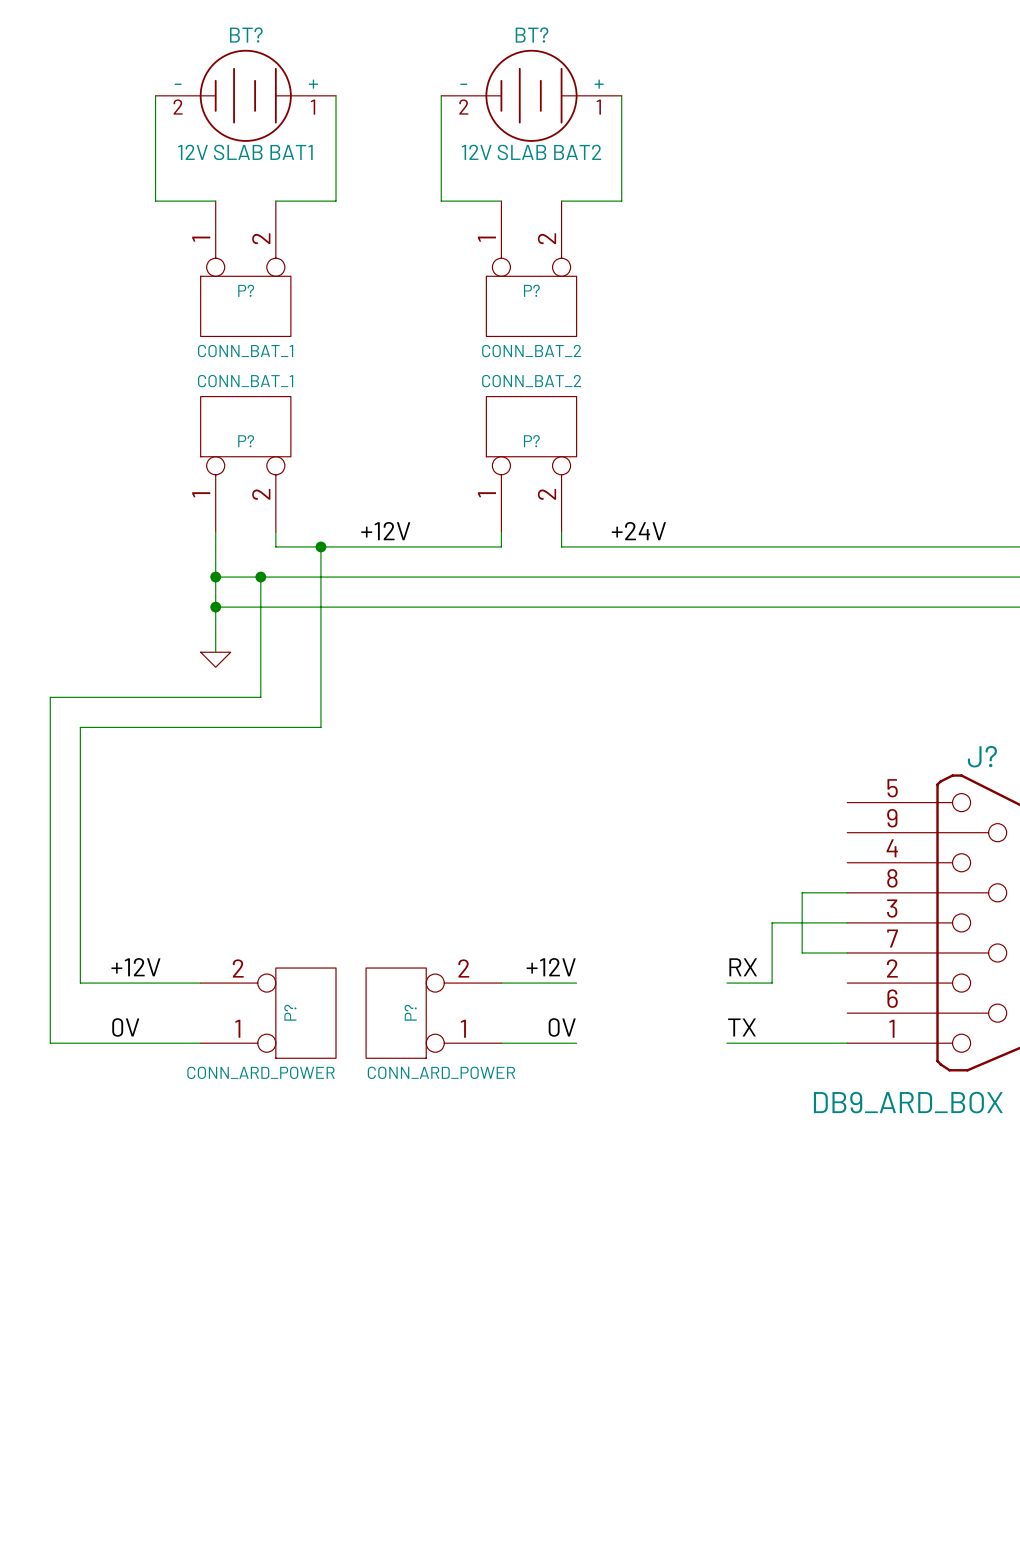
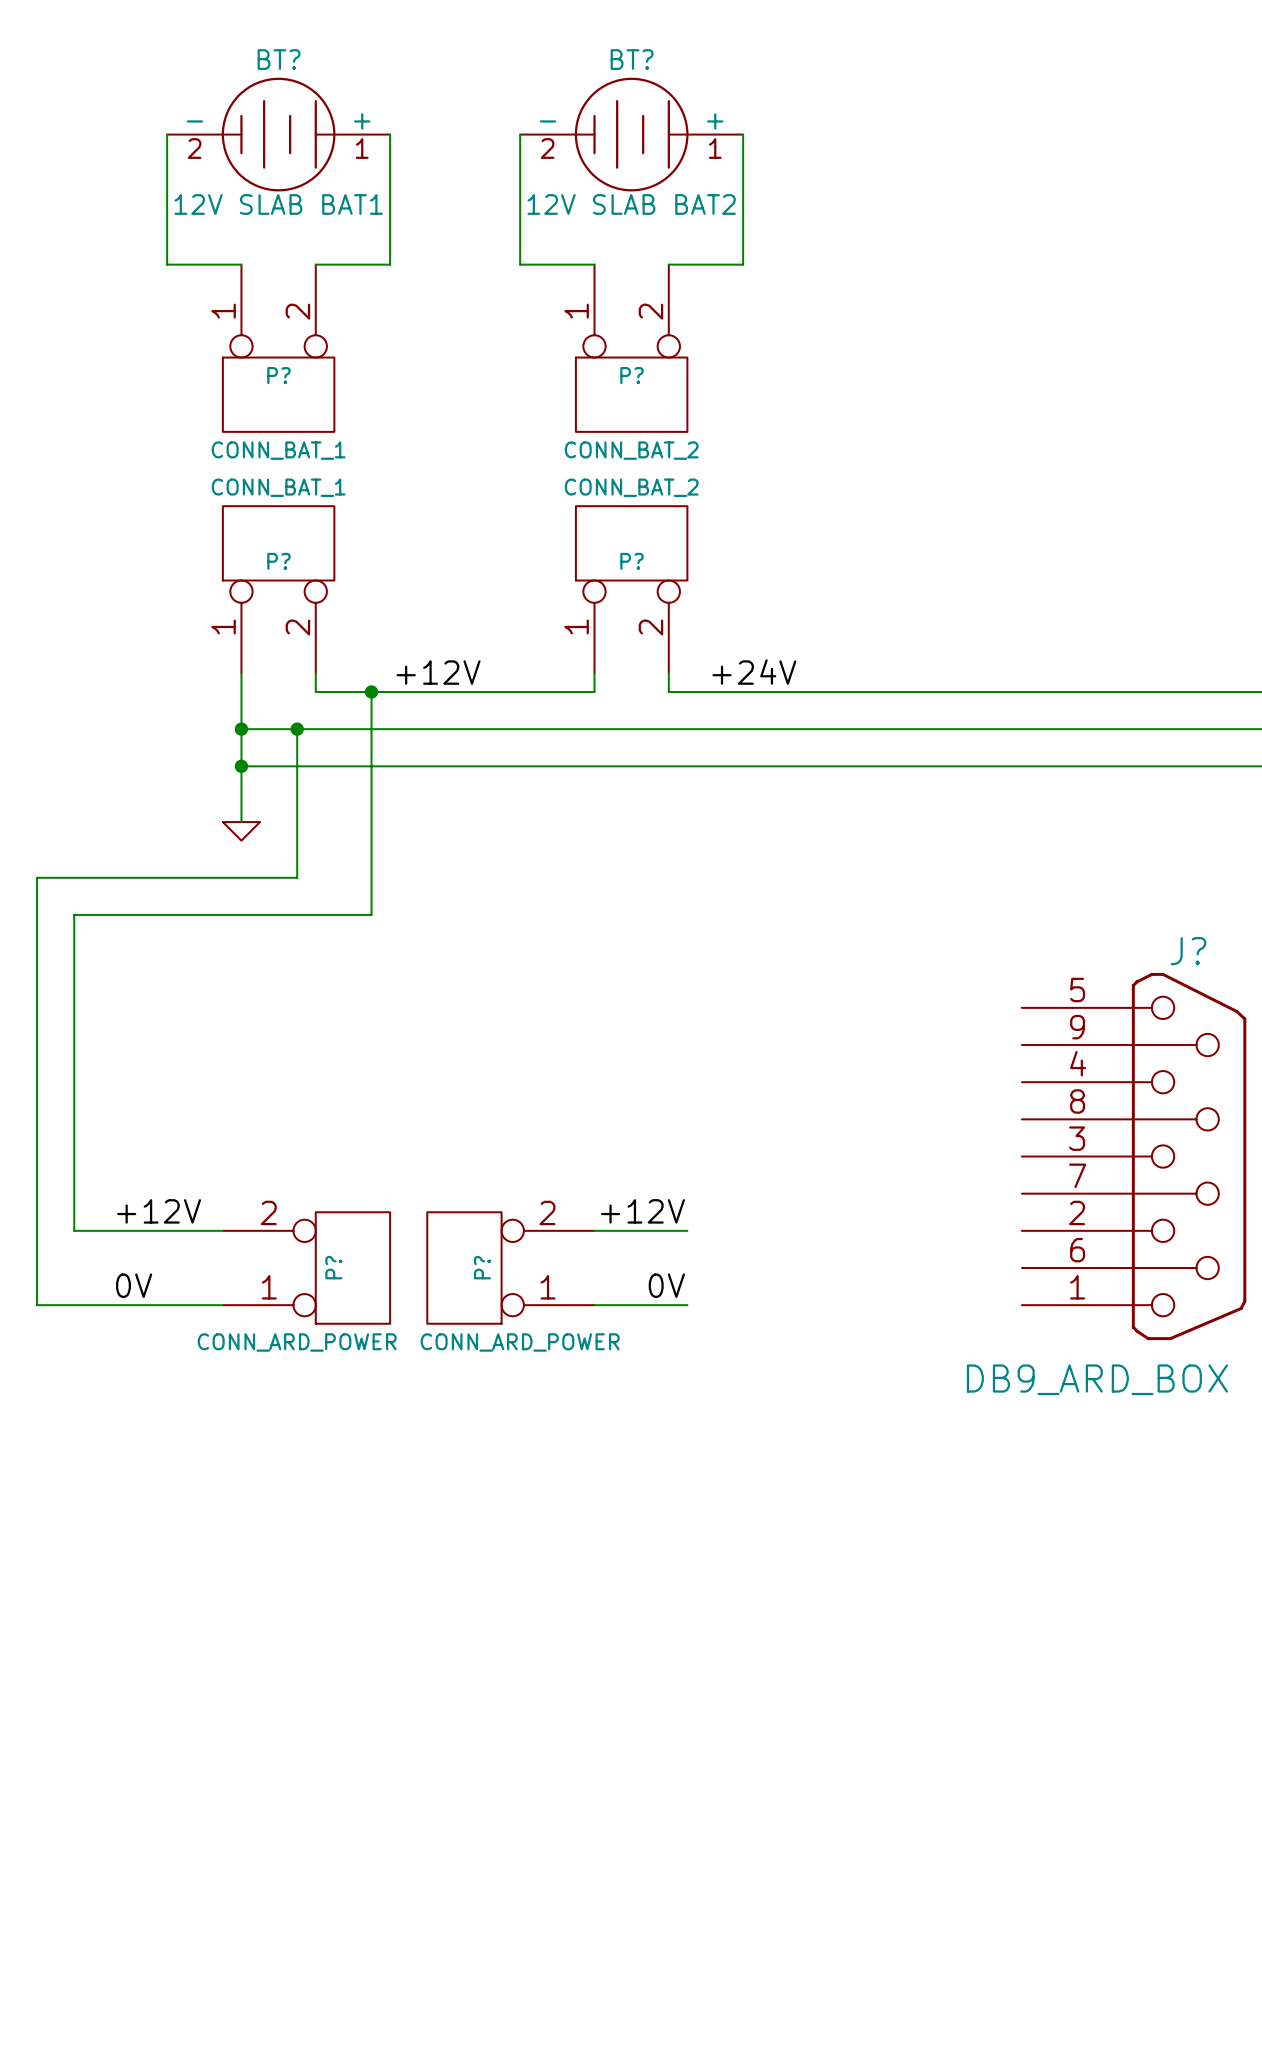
wire: (847, 892) (802, 892) (802, 952) (847, 952) -> none
wire: (847, 922) (772, 922) (772, 983) (726, 983) -> none
label: RX (743, 967) -> none
label: TX (741, 1027) -> none
wire: (726, 1043) (847, 1043) -> none

